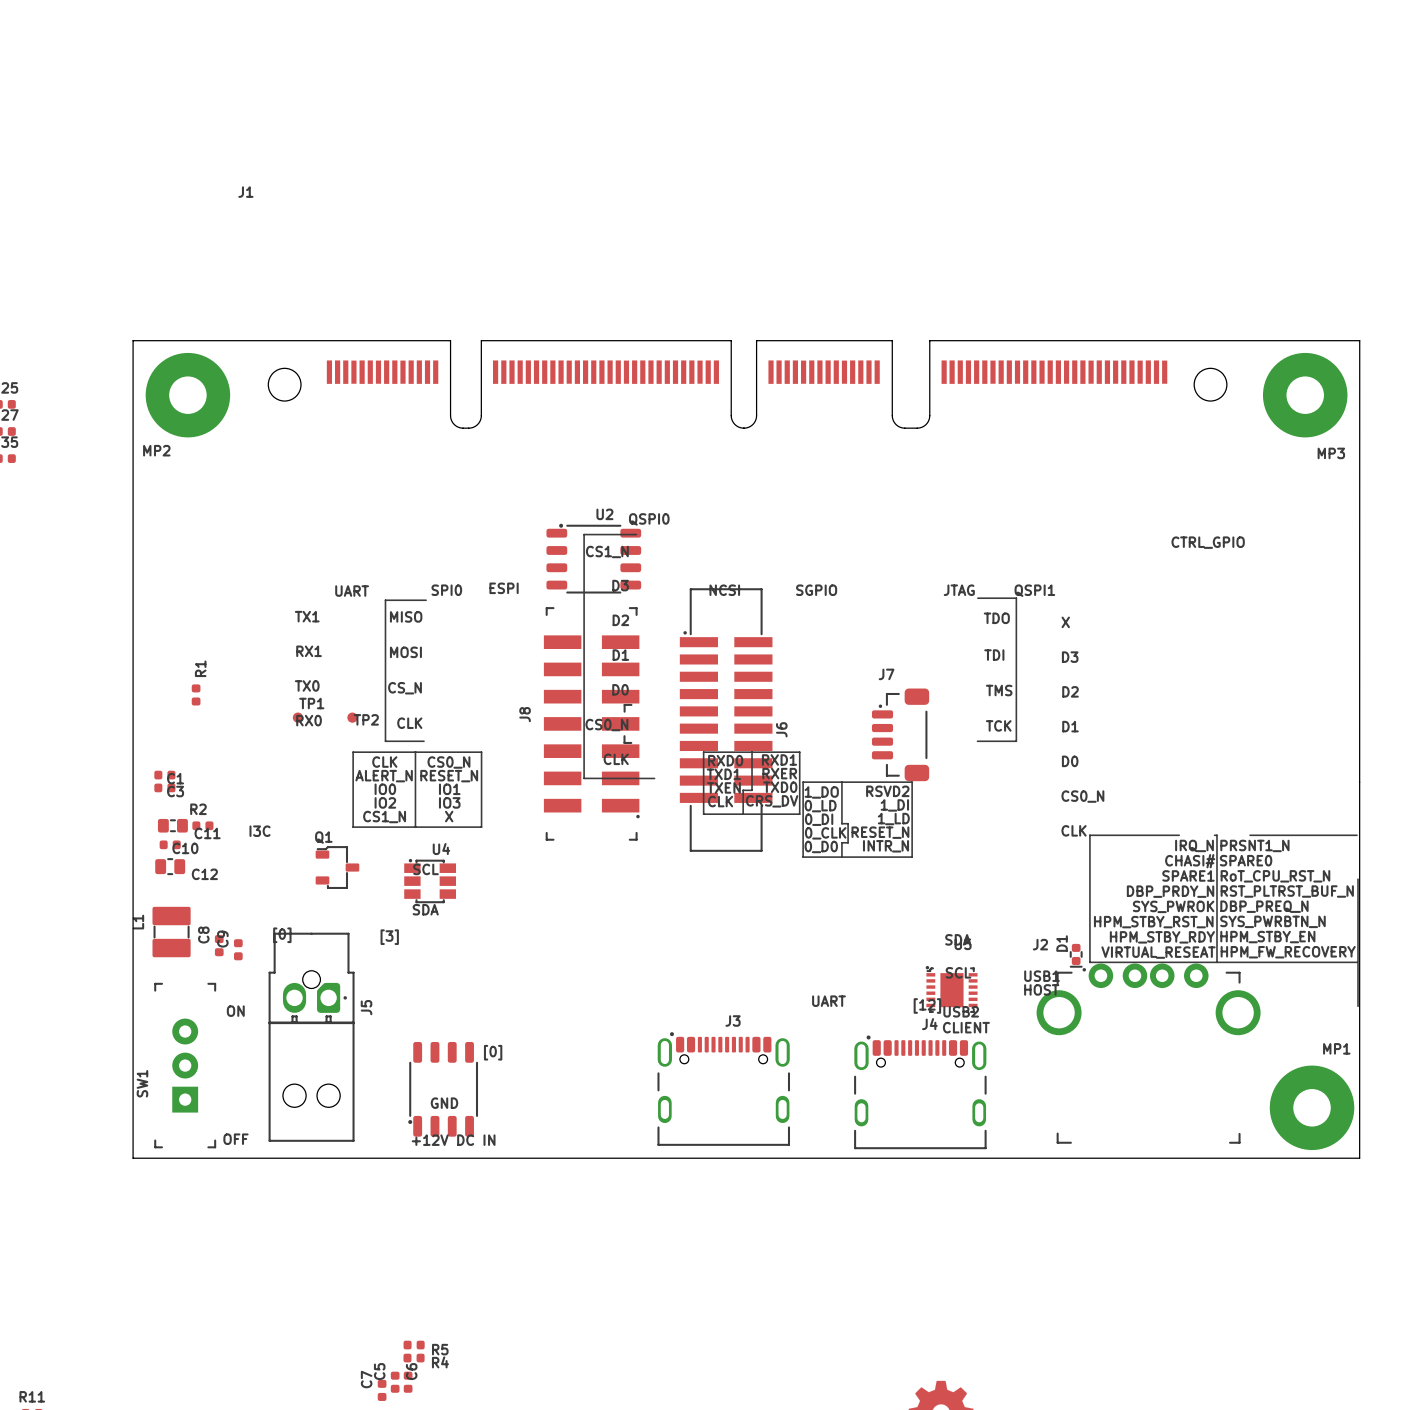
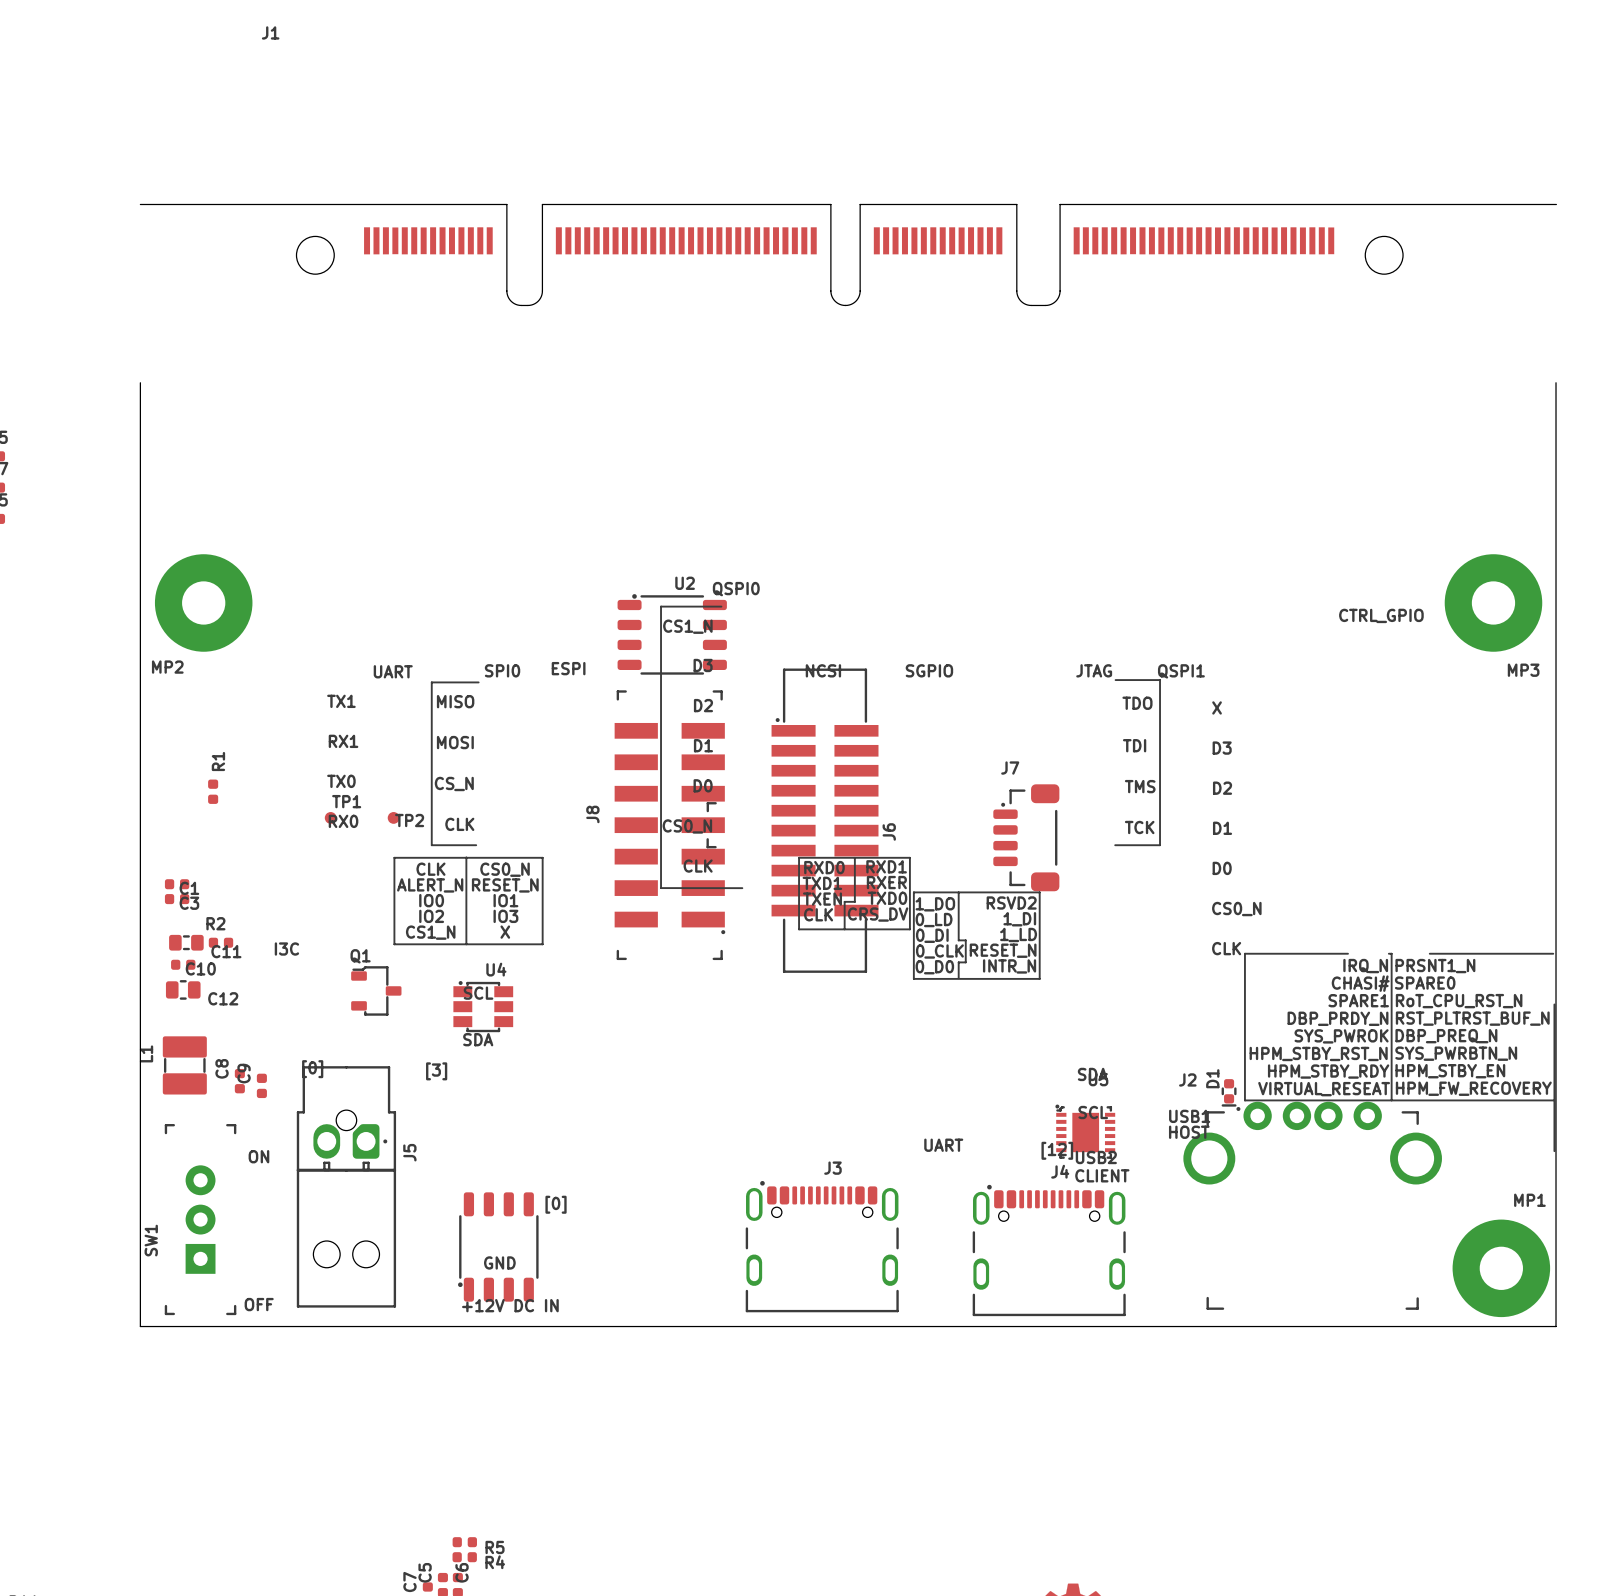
board edge: none -> (140, 204) (506, 204) (506, 292) (512, 302) (521, 305) (535, 303) (541, 294) (542, 204) (830, 204) (831, 292) (835, 301) (845, 305) (854, 302) (860, 292) (860, 204) (1016, 204) (1016, 292) (1022, 302) (1031, 305) (1051, 304) (1059, 294) (1060, 204) (1556, 204)
board edge: (133, 340) (450, 340) (450, 417) (455, 425) (463, 428) (475, 426) (480, 418) (481, 340) (731, 340) (731, 417) (736, 425) (743, 428) (751, 425) (756, 417) (756, 340) (892, 340) (892, 417) (895, 424) (904, 428) (922, 427) (929, 418) (929, 340) (1359, 340) (1359, 1158) -> (1556, 382) (1556, 1326)
J1 position: (747, 380) -> (849, 250)
MP2 position: (187, 395) -> (203, 602)
MP3 position: (1305, 395) -> (1493, 602)

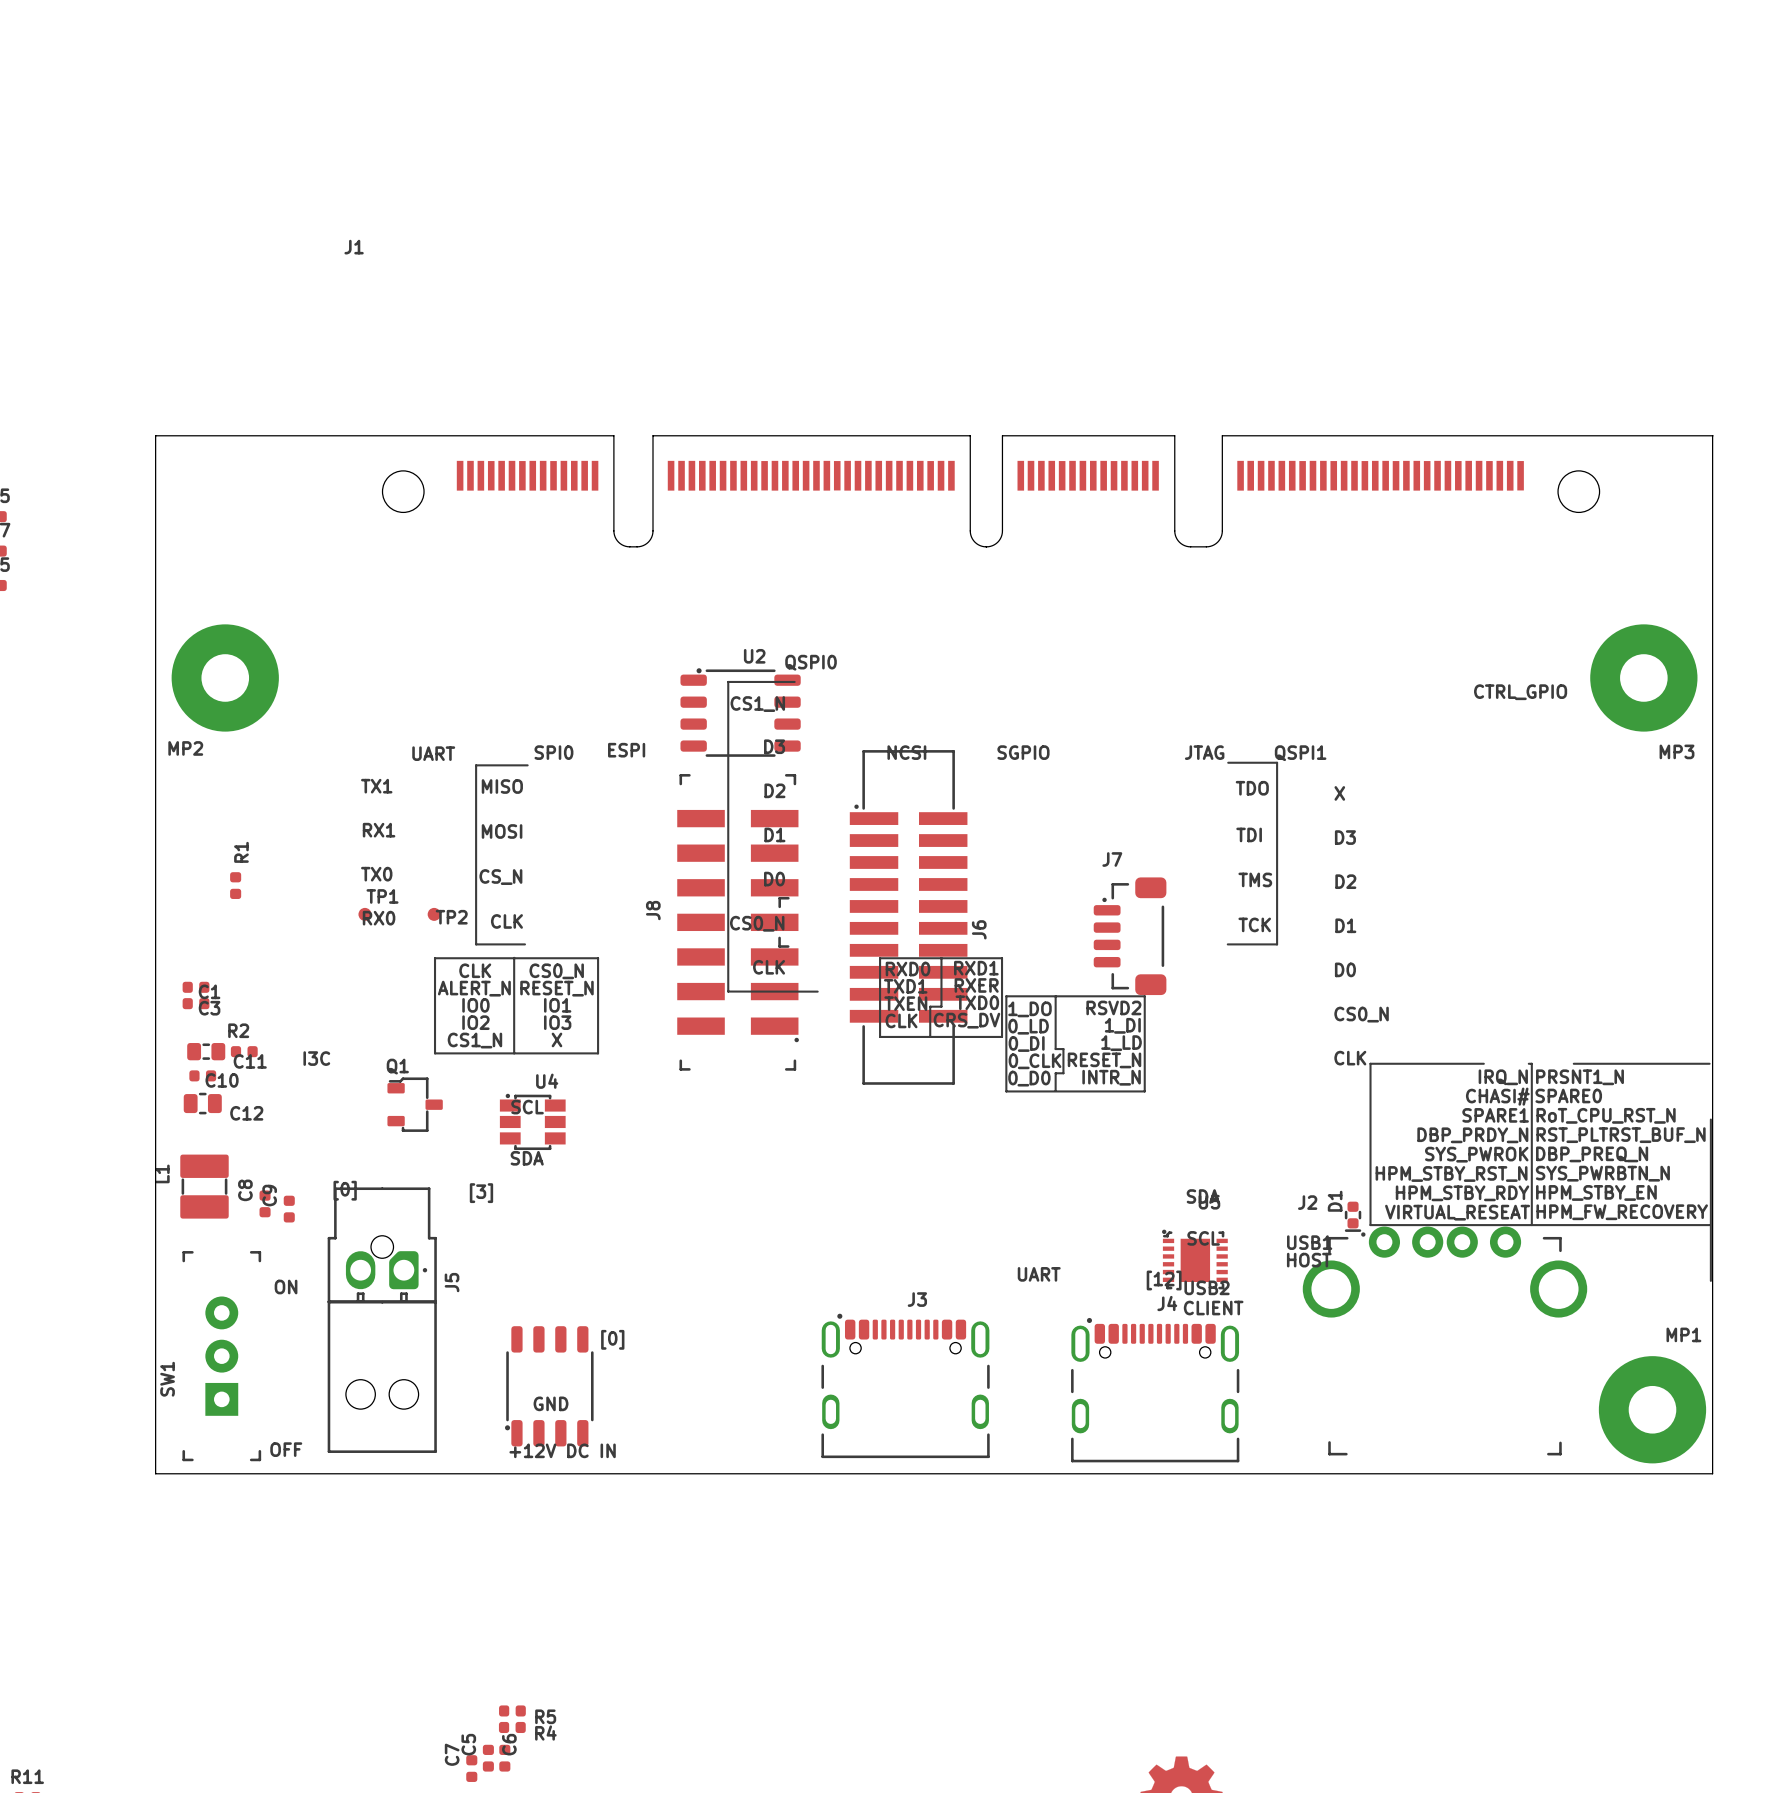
board edge: (140, 204) (506, 204) (506, 292) (512, 302) (521, 305) (535, 303) (541, 294) (542, 204) (830, 204) (831, 292) (835, 301) (845, 305) (854, 302) (860, 292) (860, 204) (1016, 204) (1016, 292) (1022, 302) (1031, 305) (1051, 304) (1059, 294) (1060, 204) (1556, 204) -> none
J1 position: (849, 250) -> (991, 486)
board edge: none -> (155, 435) (613, 435) (614, 533) (620, 543) (629, 546) (645, 544) (652, 535) (652, 435) (970, 435) (970, 533) (974, 542) (986, 546)
board edge: none -> (1713, 435) (1222, 435) (1222, 533) (1217, 542) (1206, 546) (1184, 545) (1179, 542) (1175, 535) (1174, 435) (1002, 435) (1002, 533) (997, 542) (986, 546)

